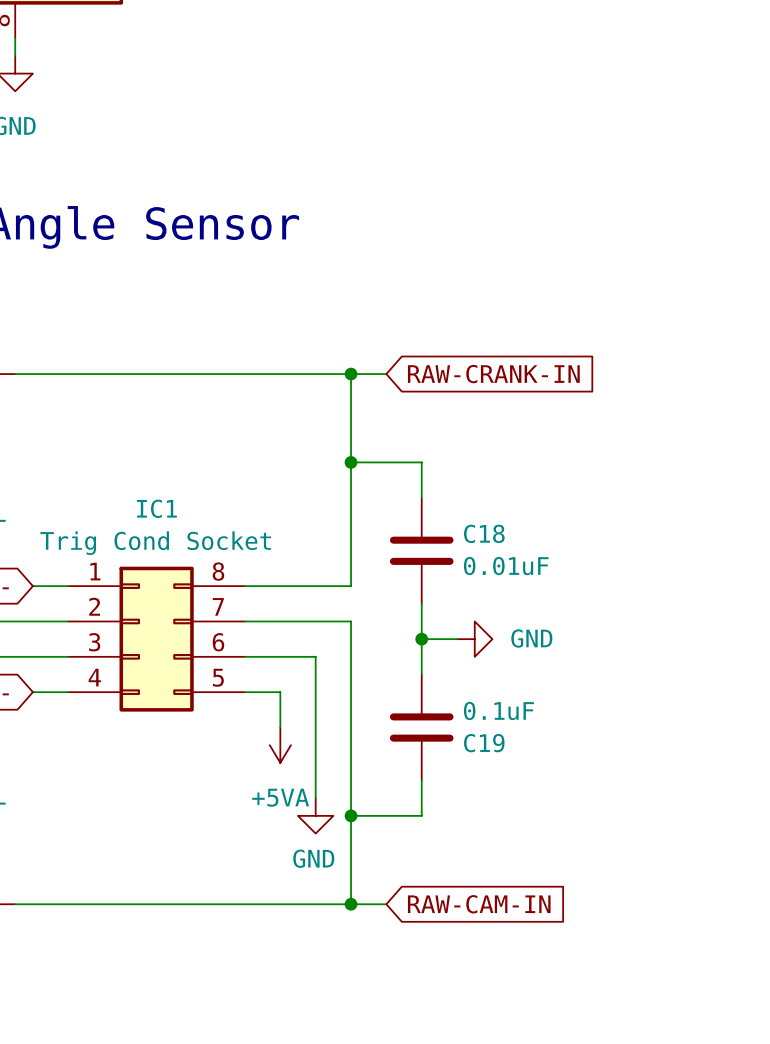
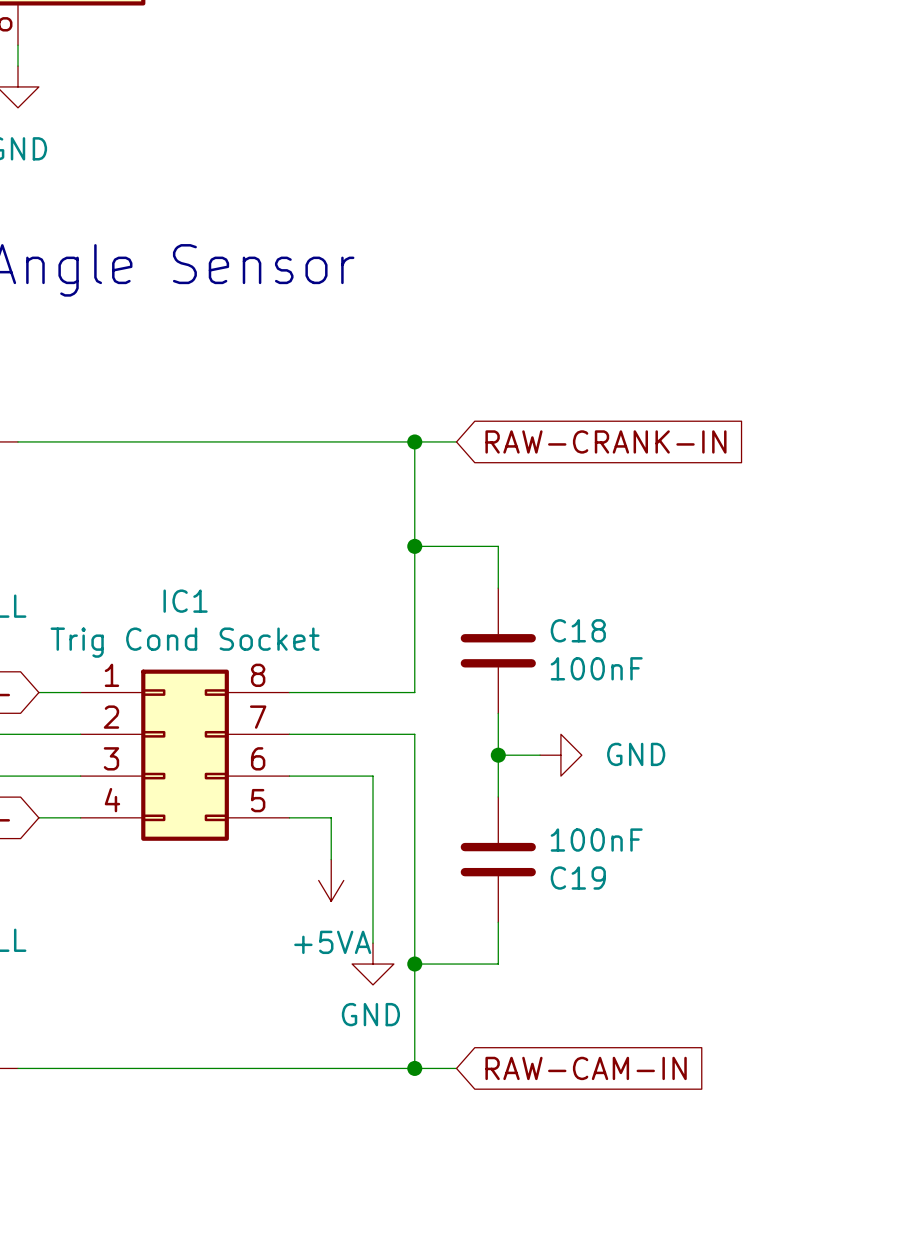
C18 value: 0.01uF (506, 566) -> 100nF (596, 668)
C19 value: 0.1uF (498, 710) -> 100nF (596, 840)

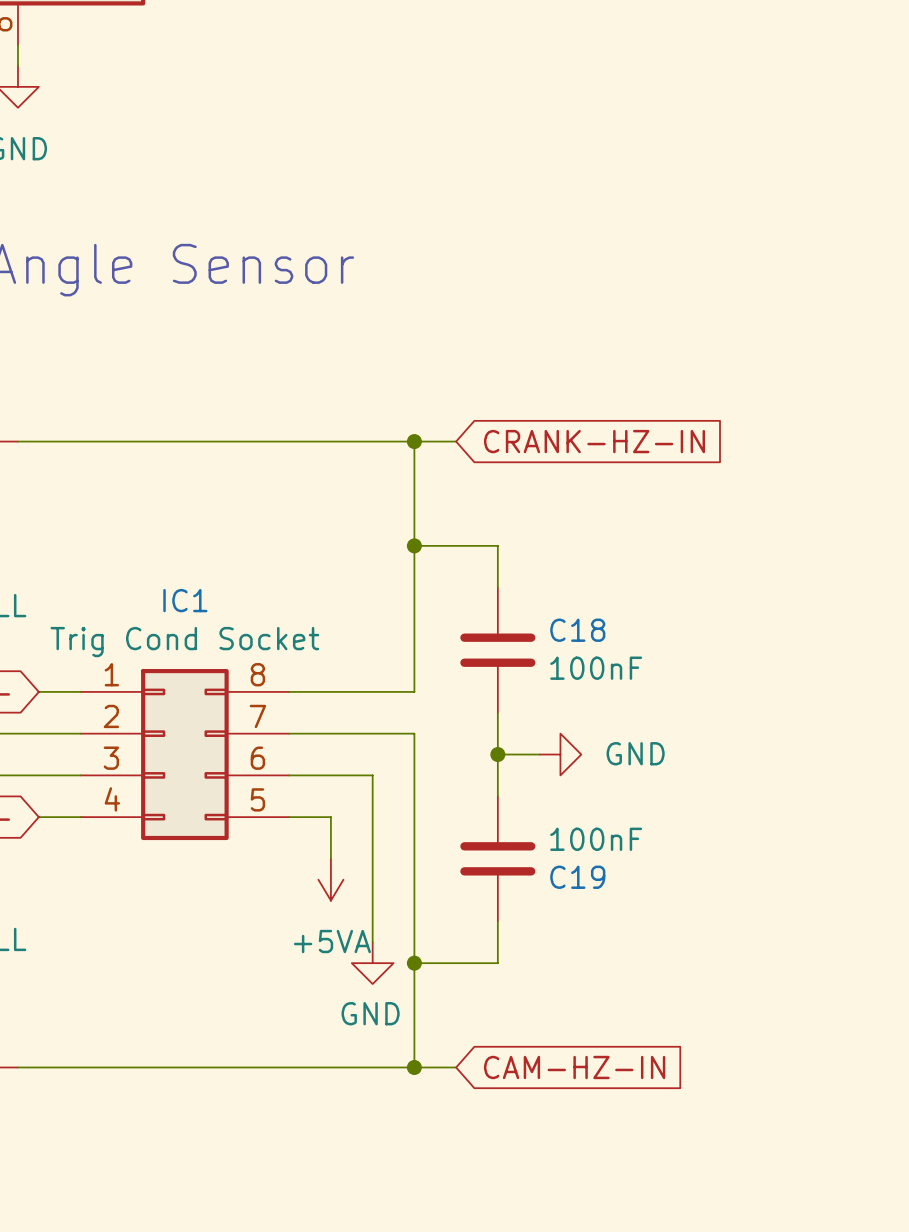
global label: RAW-CRANK-IN (605, 441) -> CRANK-HZ-IN (594, 441)
global label: RAW-CAM-IN (586, 1068) -> CAM-HZ-IN (574, 1067)

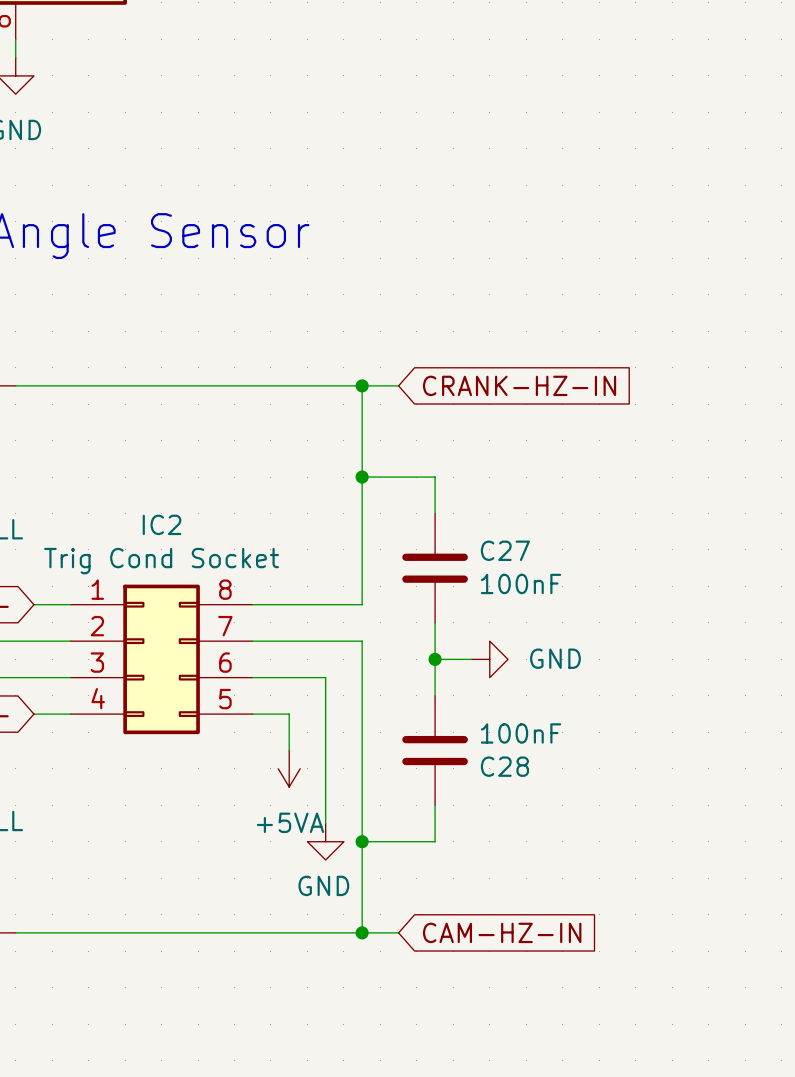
IC1 name: IC1 (185, 600) -> IC2 (162, 524)
C18 name: C18 (577, 630) -> C27 (505, 550)
C19 name: C19 (577, 877) -> C28 (504, 766)

